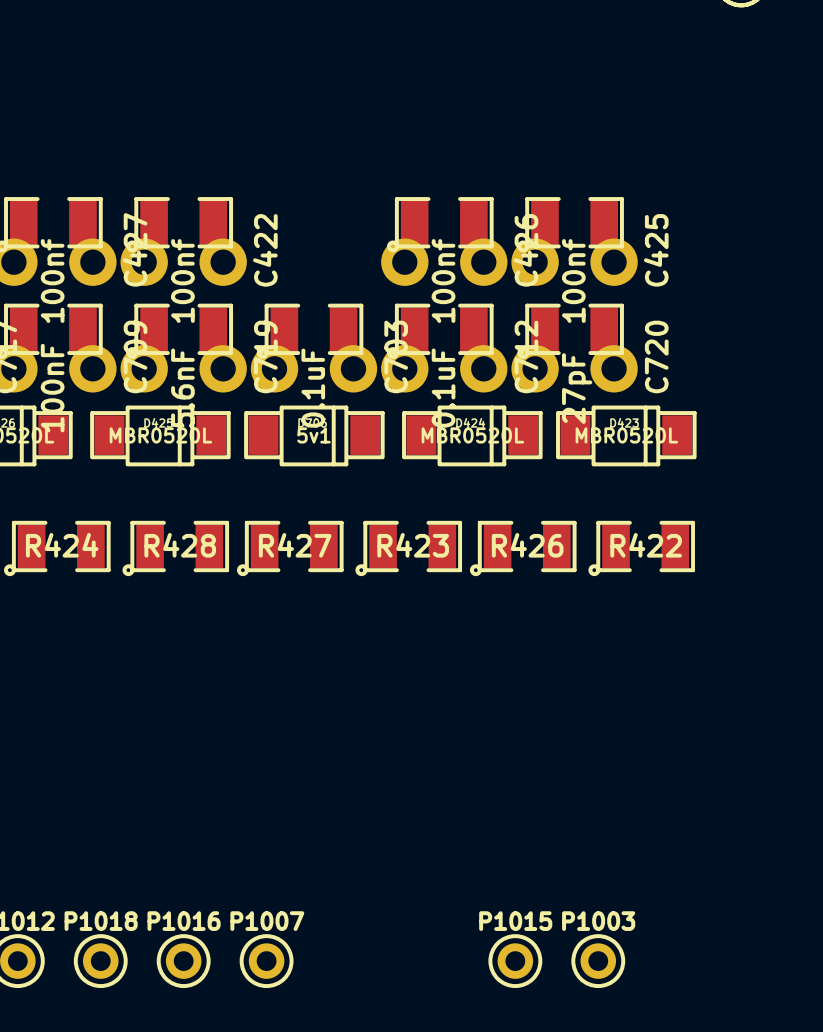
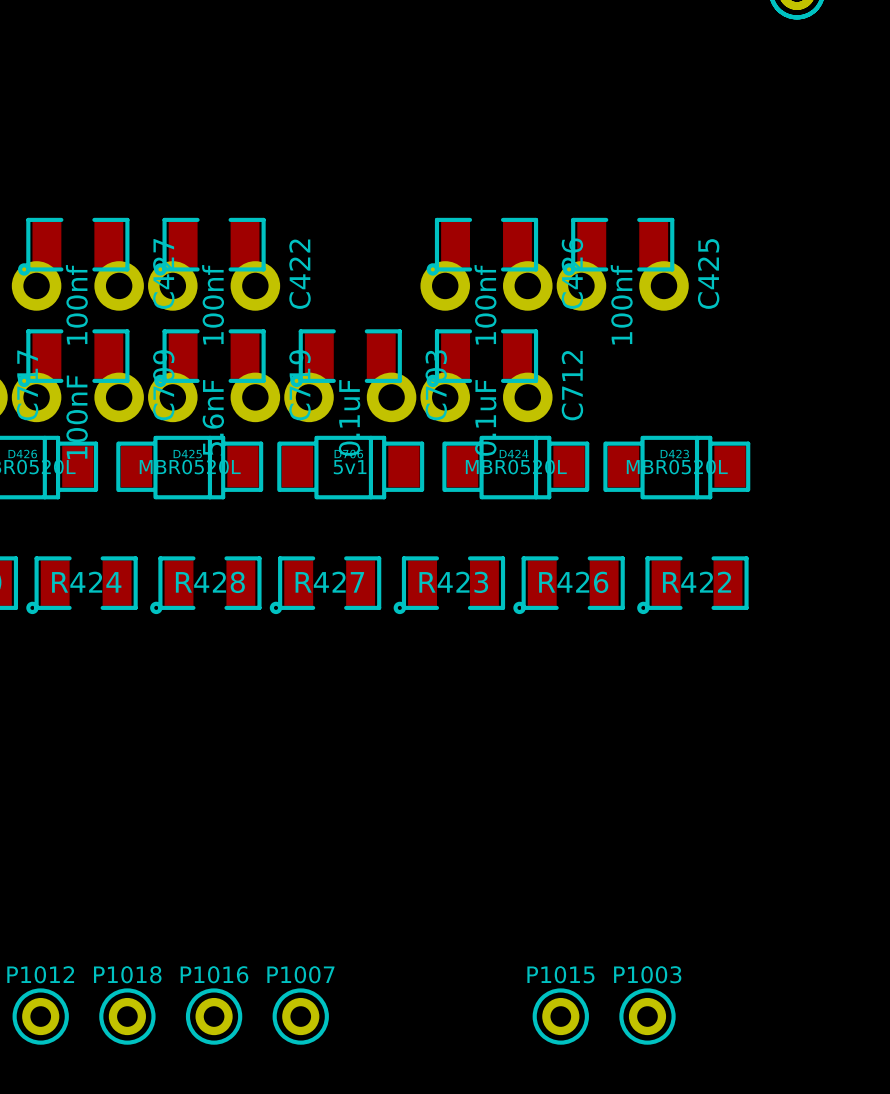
C720: 27pF (574, 348) -> none

